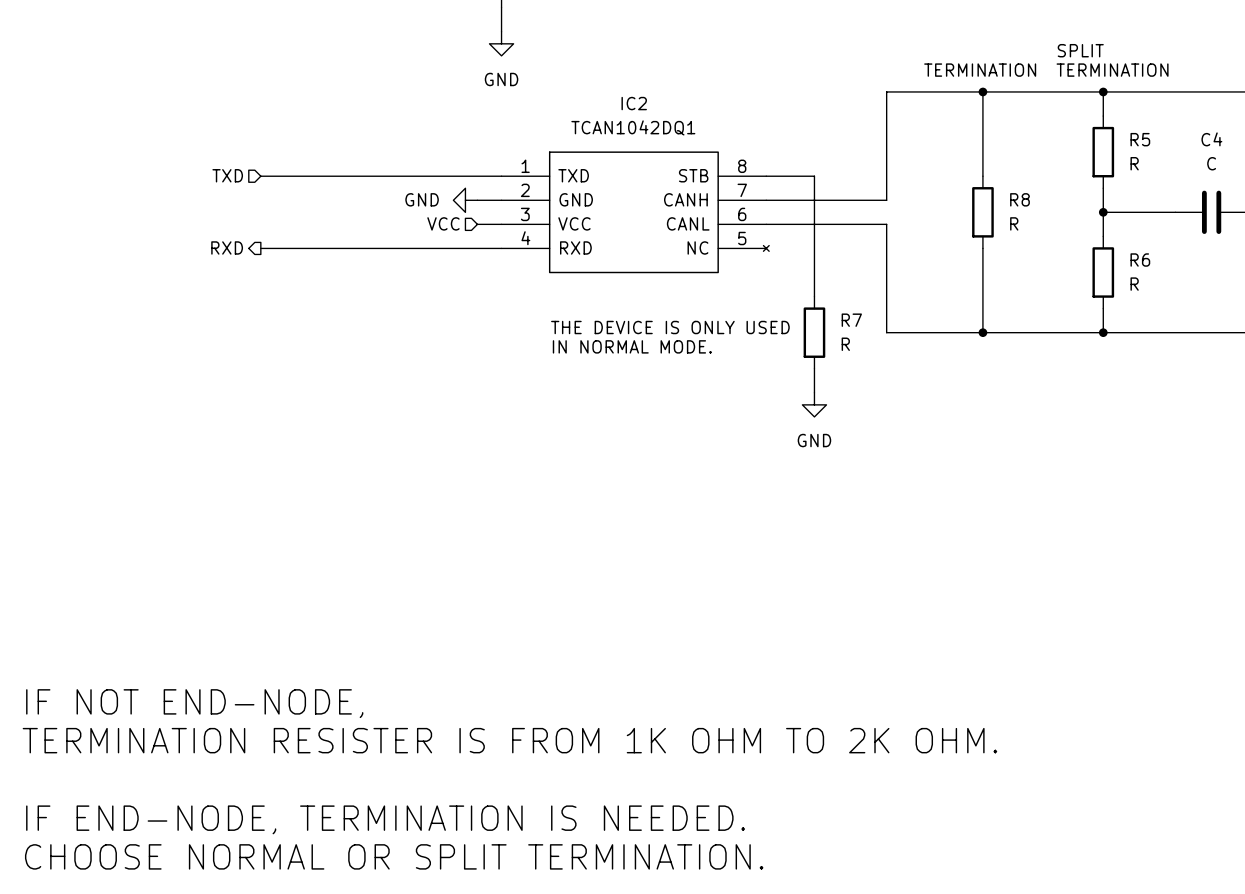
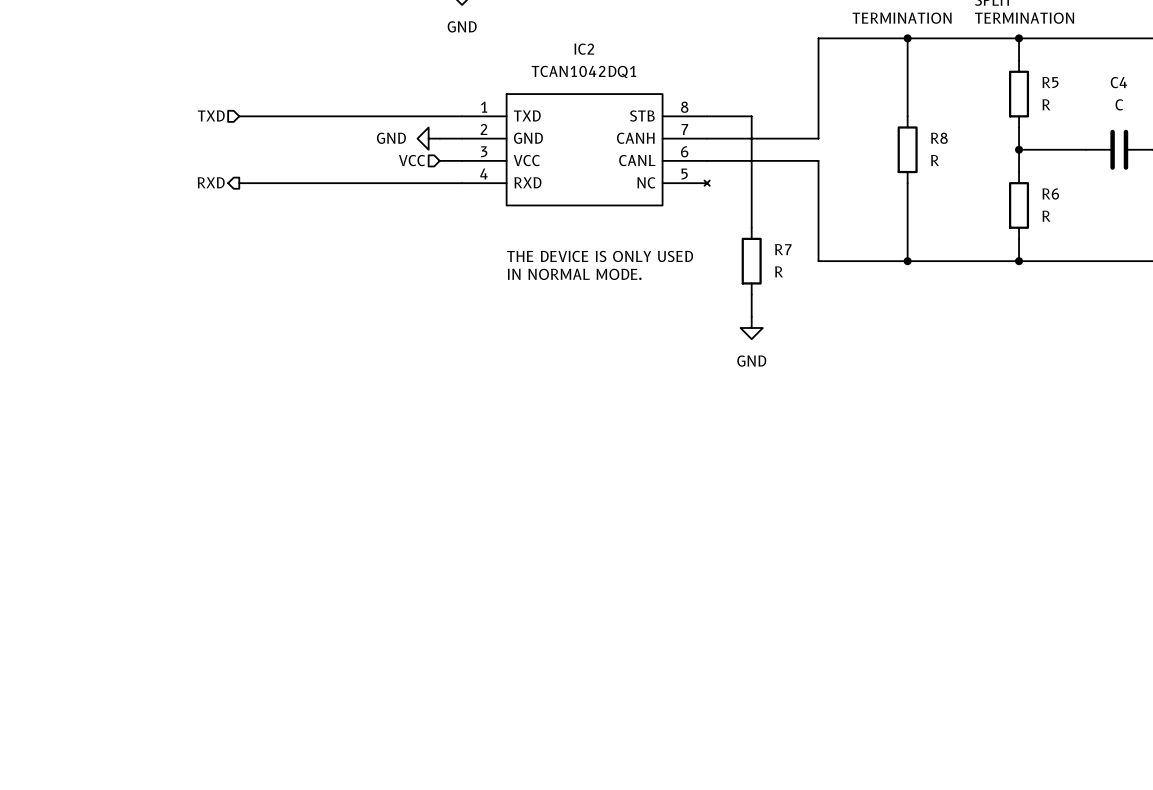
text: IF NOT END-NODE, (194, 703) -> none
text: TERMINATION RESISTER IS FROM 1K OHM TO 2K OHM. (509, 740) -> none
text: IF END-NODE, TERMINATION IS NEEDED. (385, 819) -> none
text: CHOOSE NORMAL OR SPLIT TERMINATION. (394, 856) -> none

